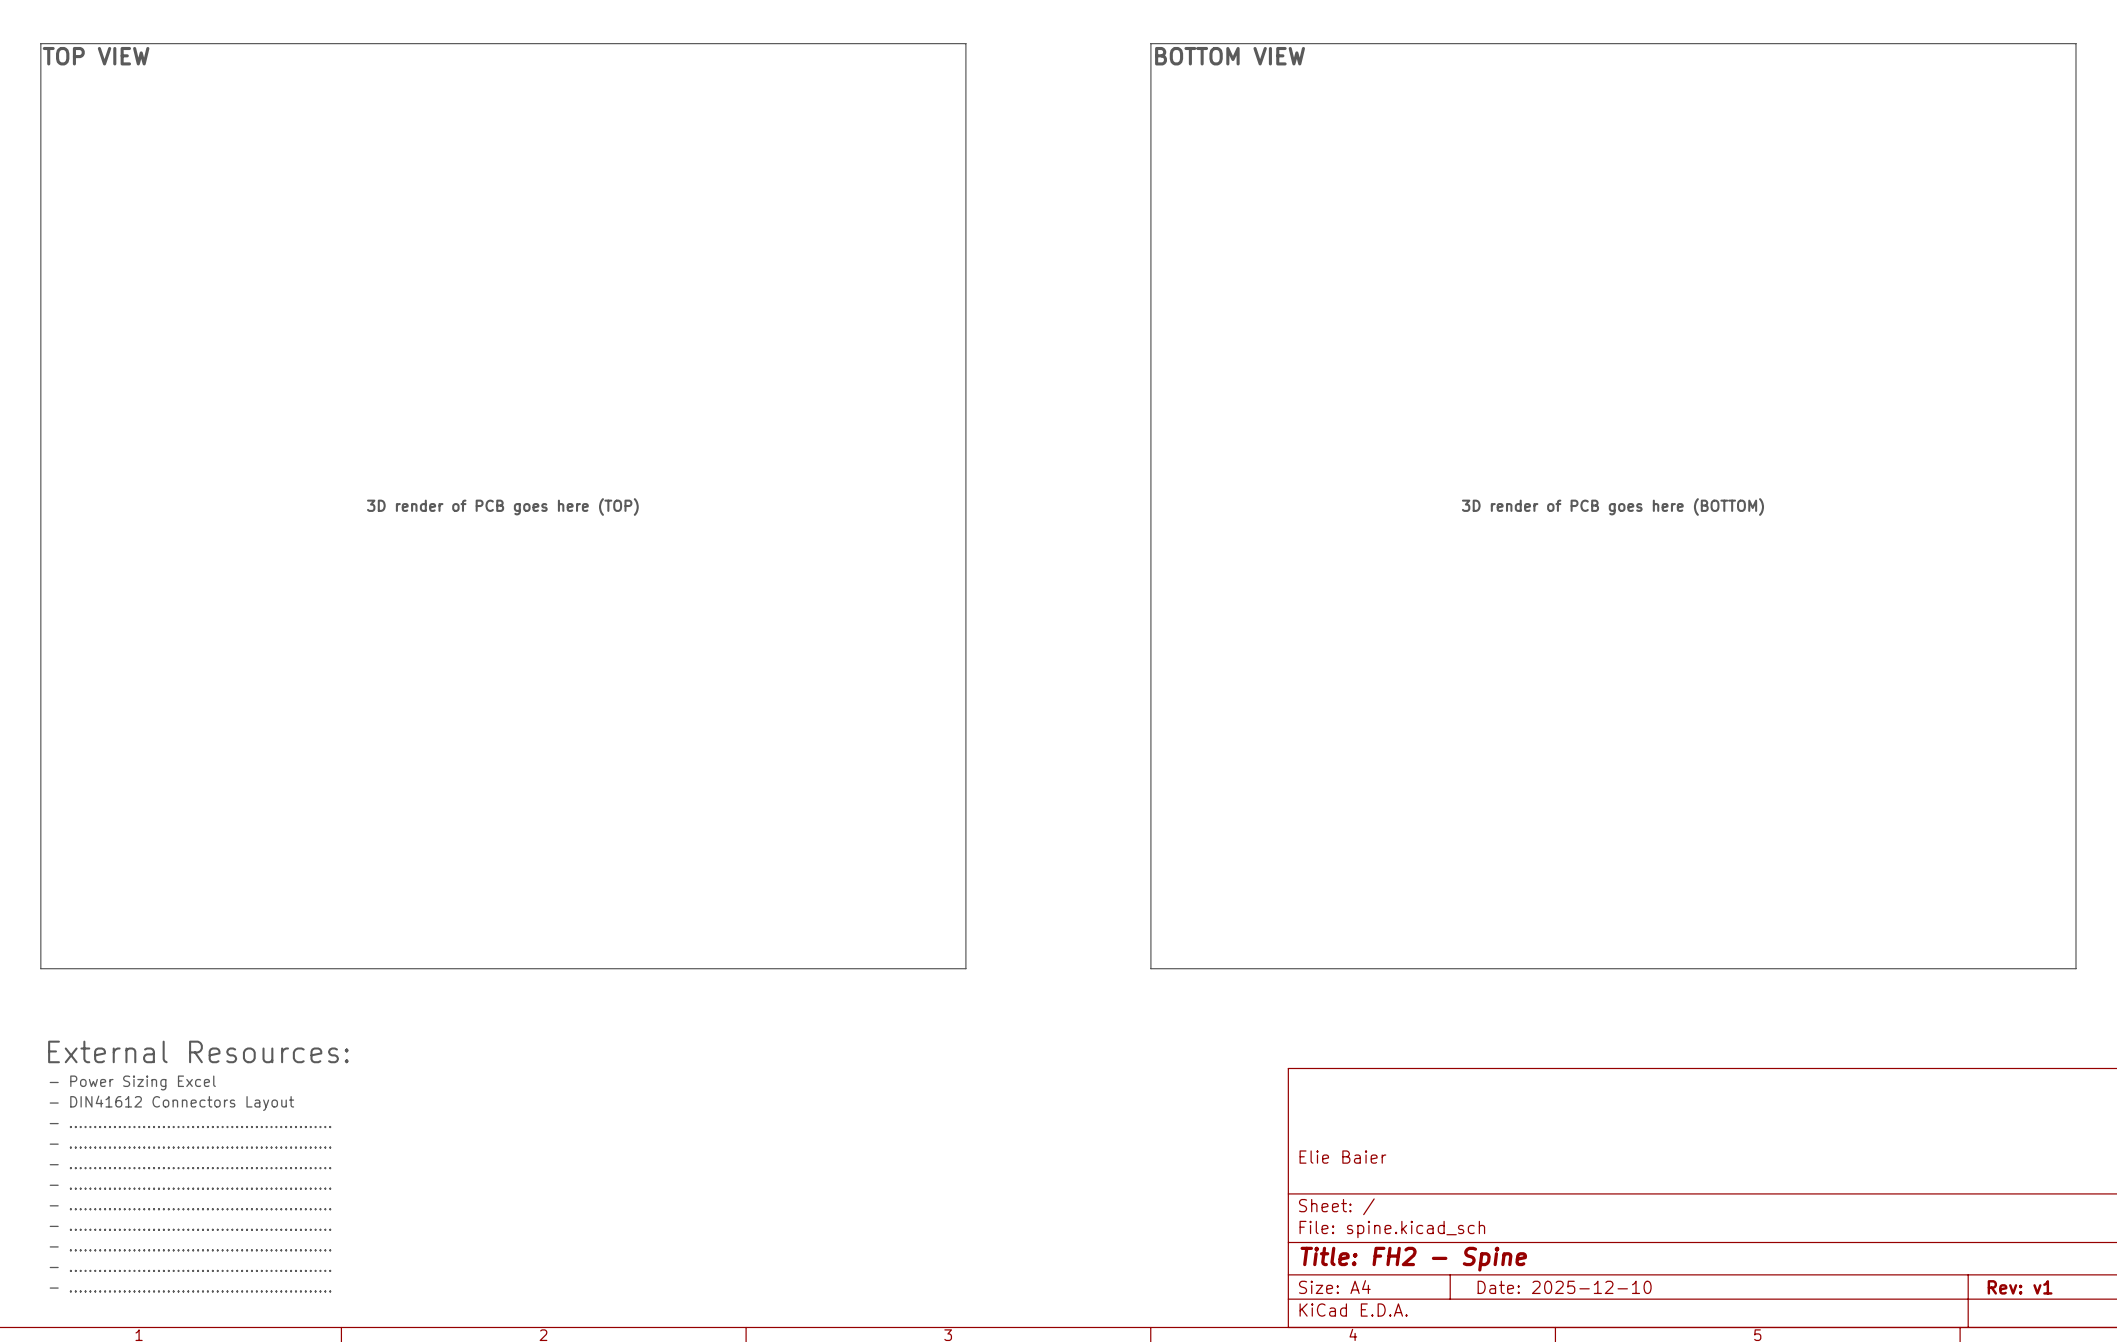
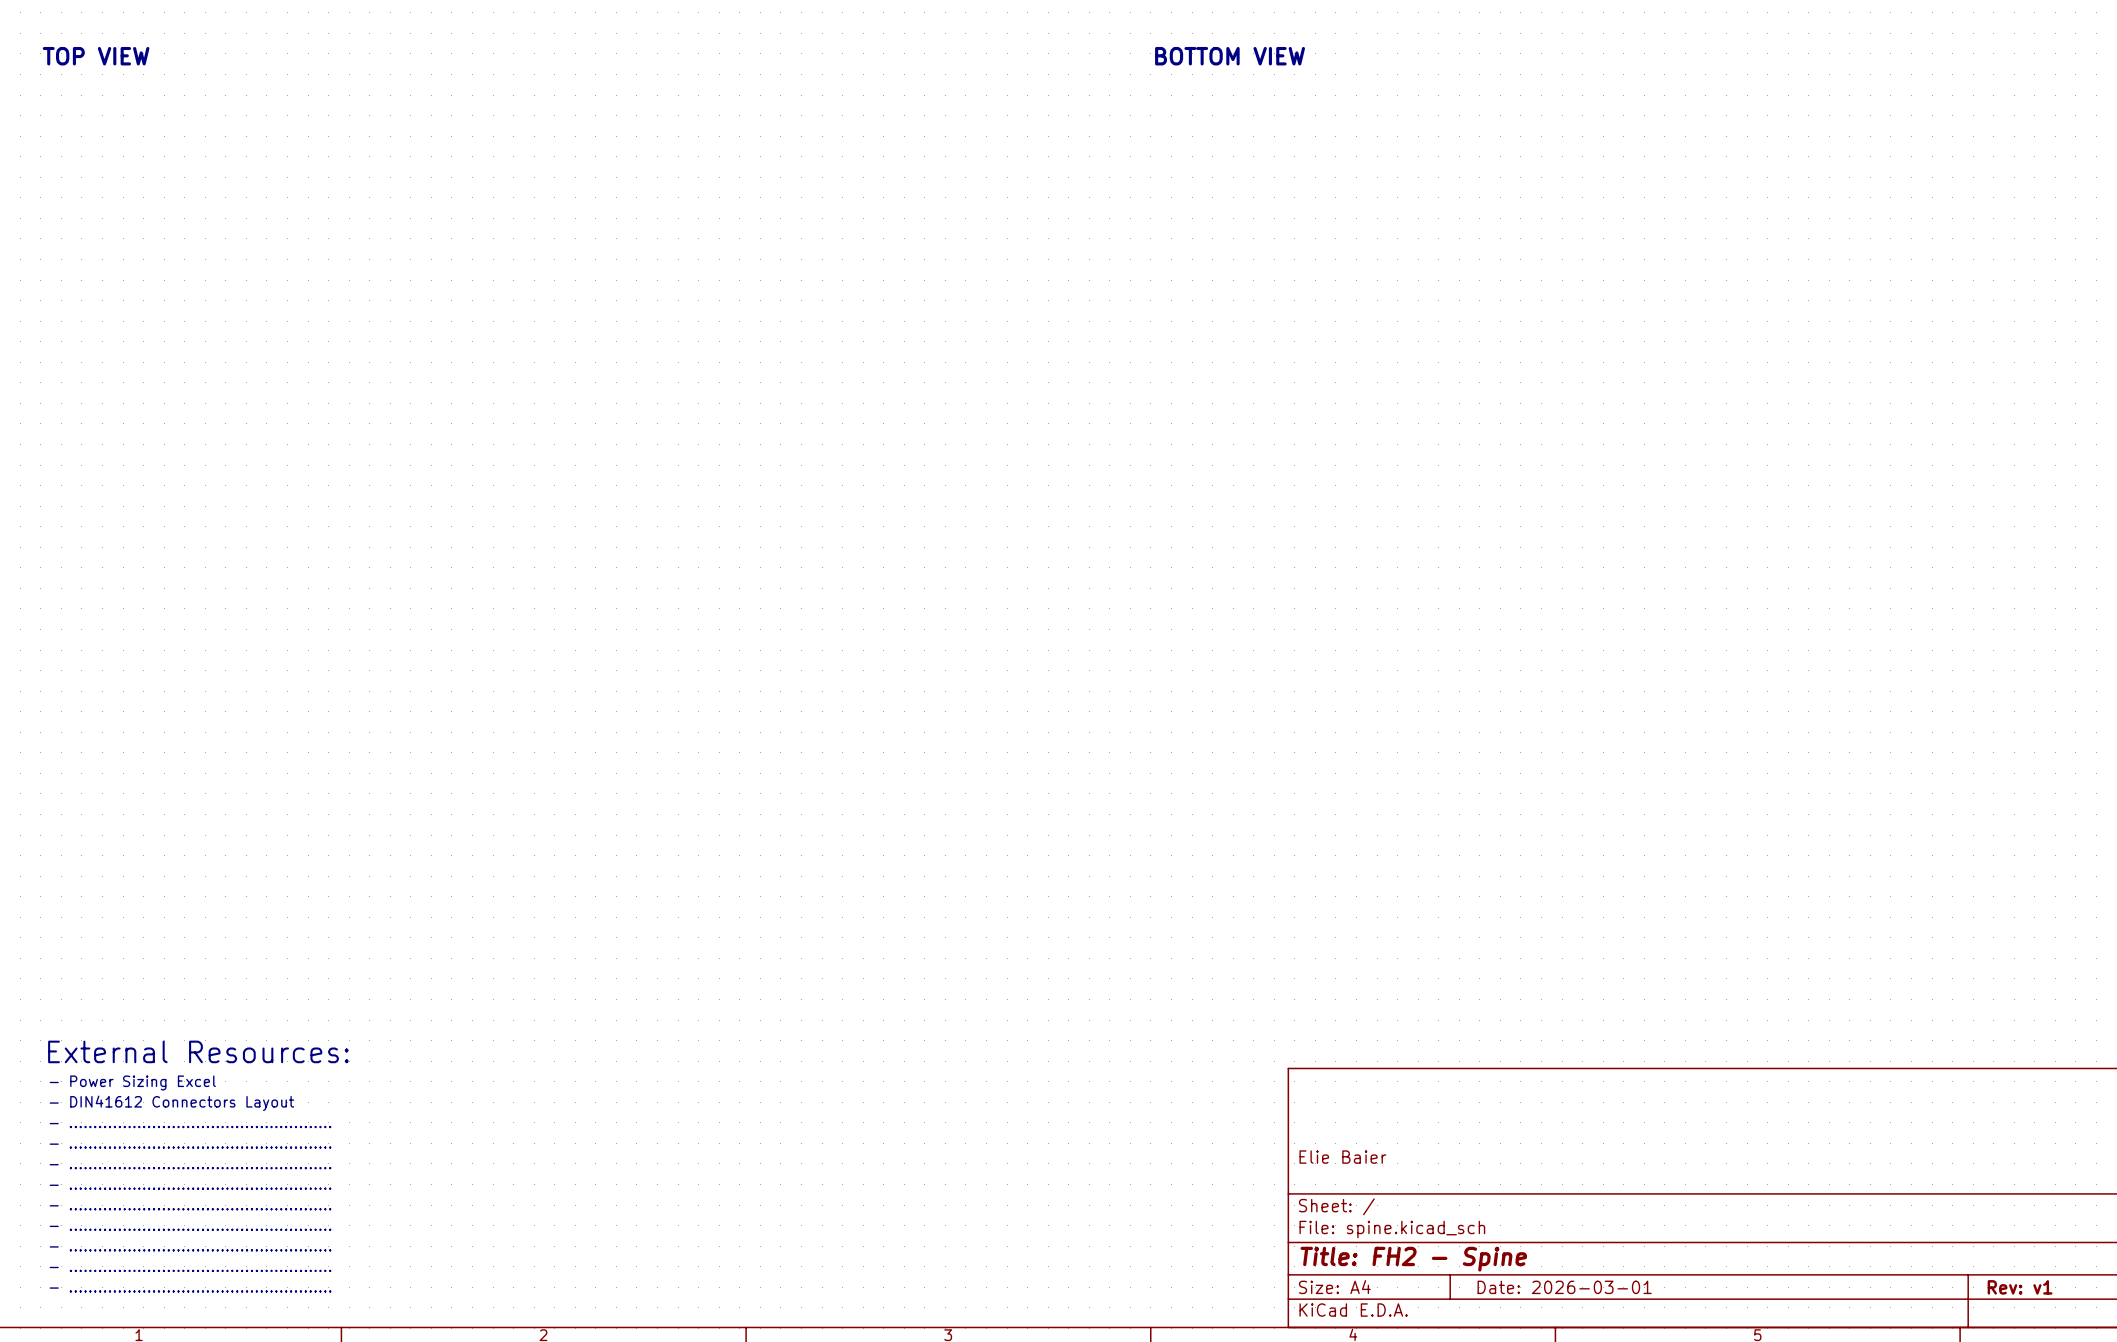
line: (40, 43) (965, 43) (965, 968) (40, 968) (40, 43) -> none
line: (1150, 43) (2075, 43) (2075, 968) (1150, 968) (1150, 43) -> none
text: 3D render of PCB goes here (TOP) (502, 507) -> none
text: 3D render of PCB goes here (BOTTOM) (1612, 507) -> none
title block: Date: 2025-12-10 (1564, 1287) -> Date: 2026-03-01 (1564, 1287)

